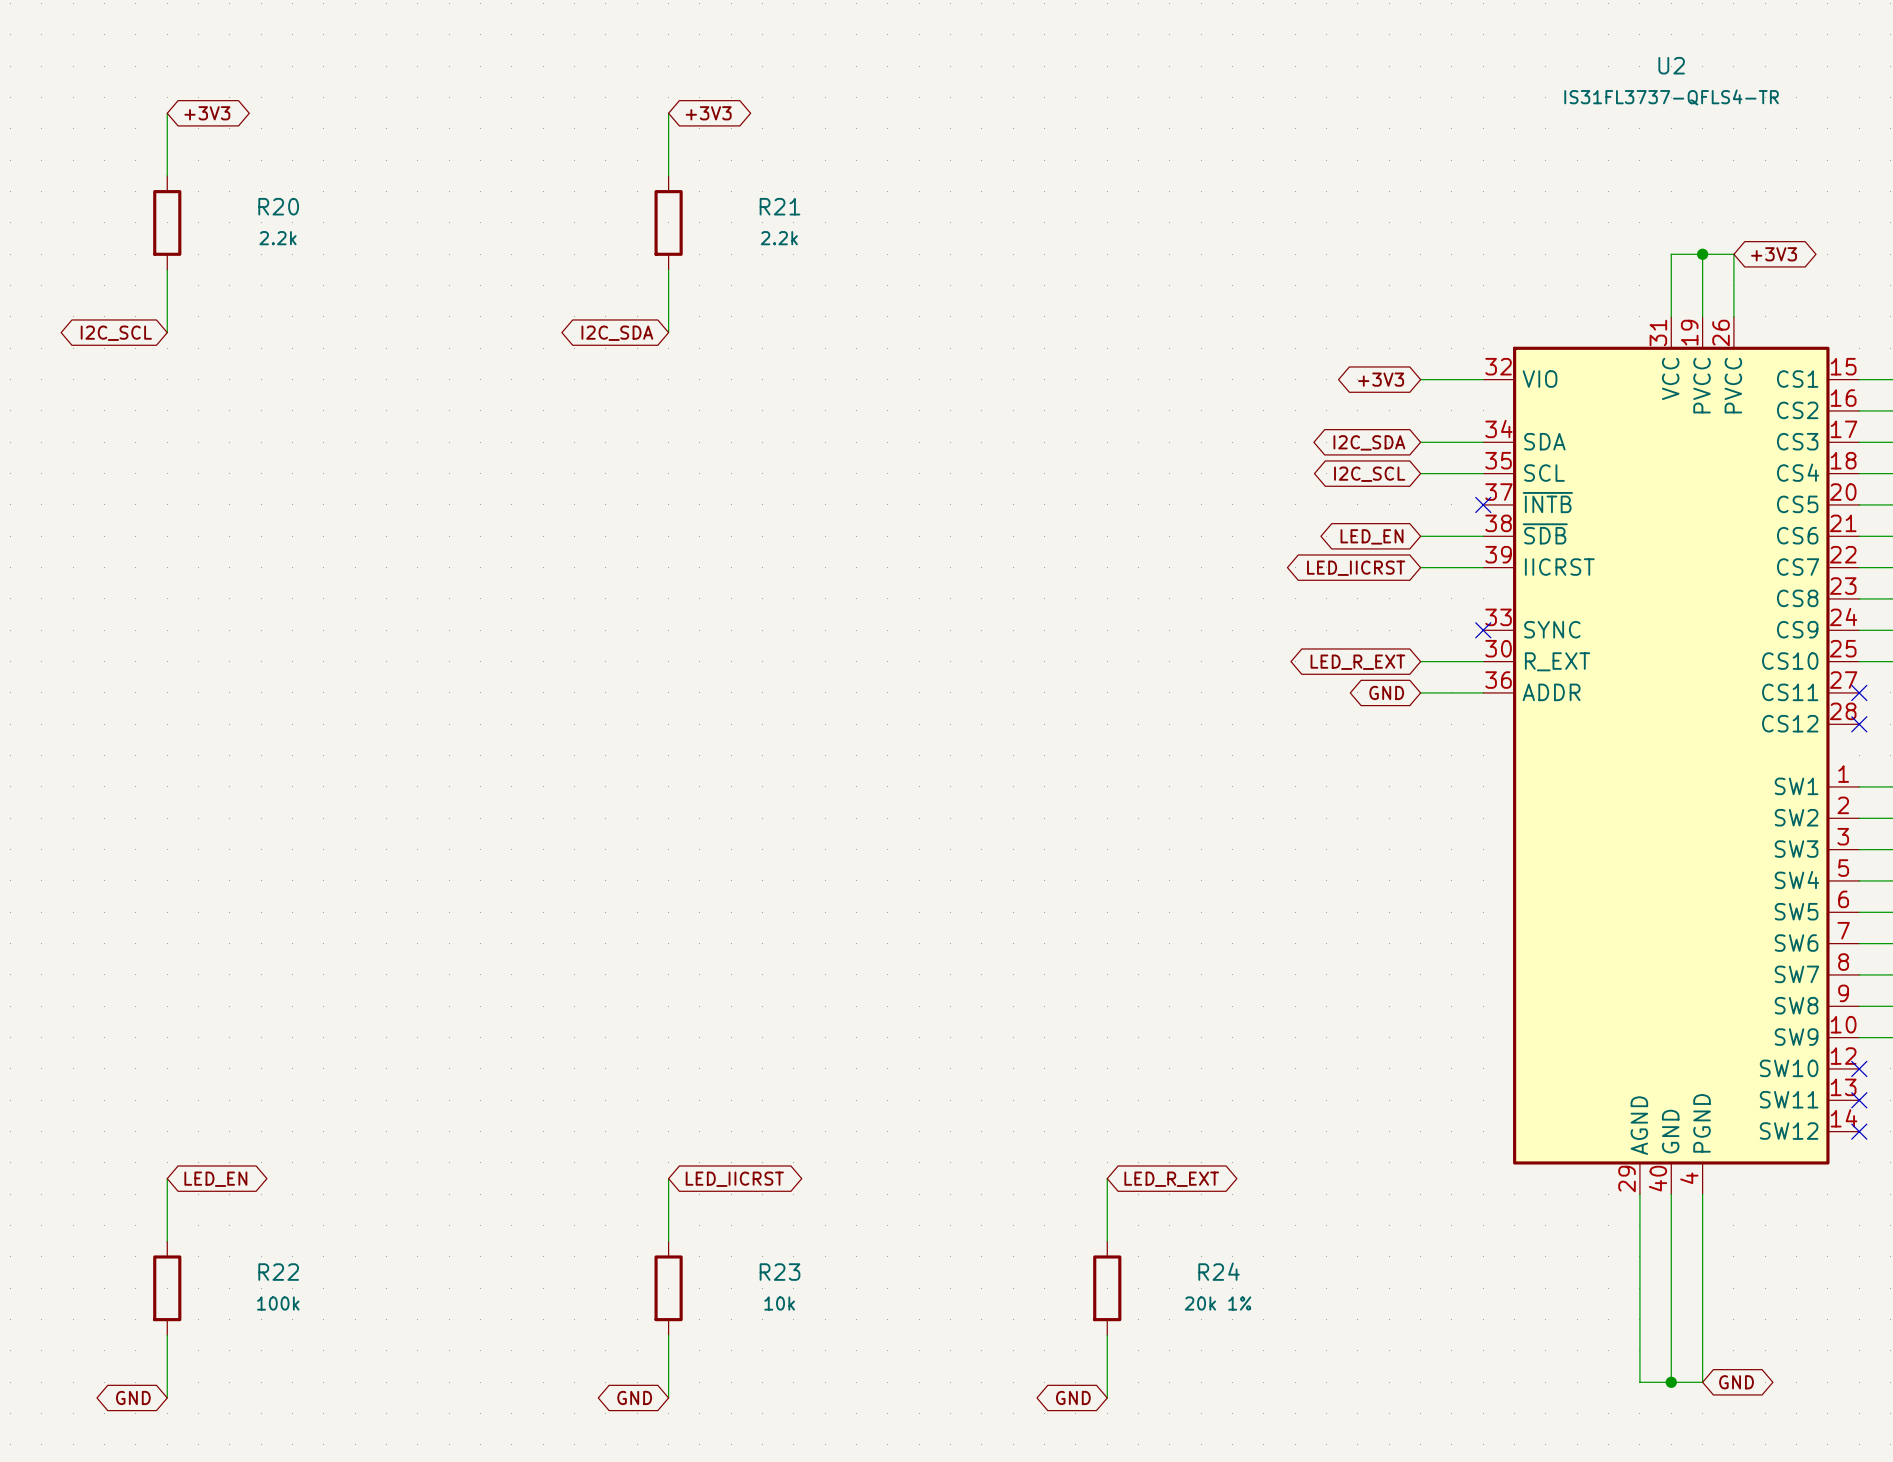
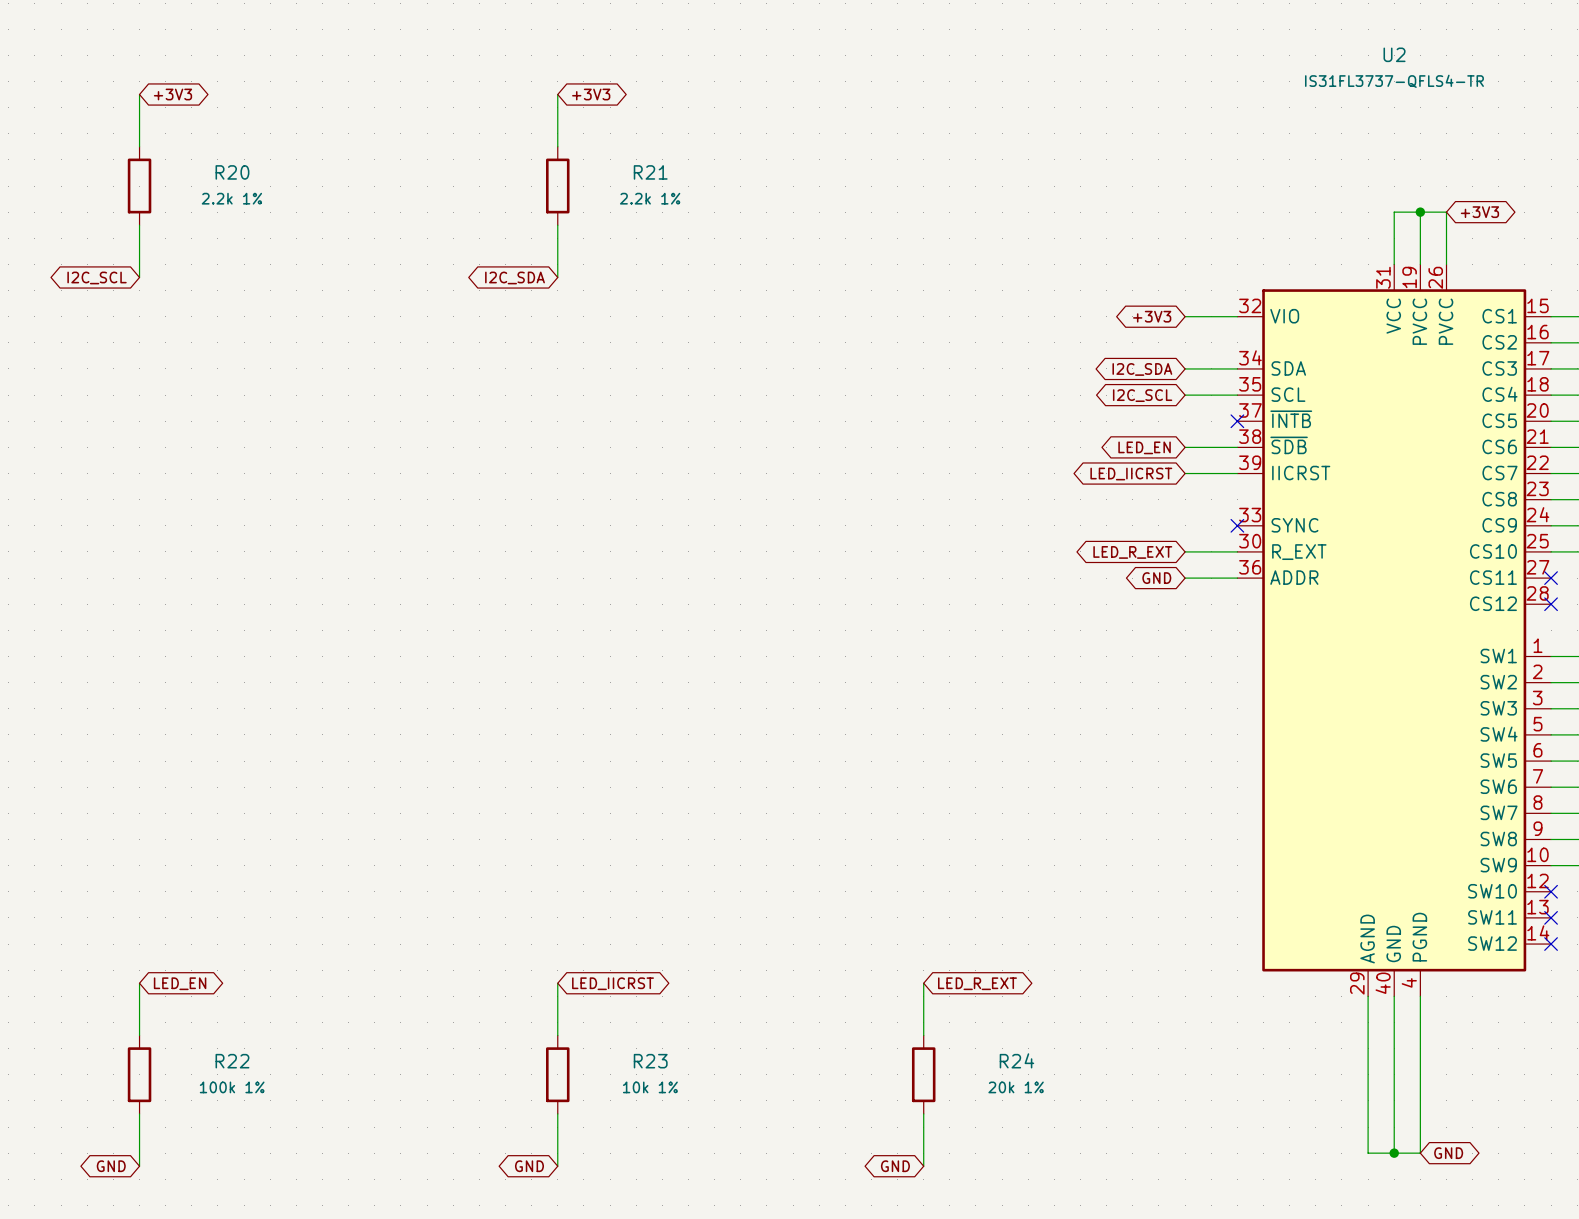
R20 value: 2.2k (278, 238) -> 2.2k 1% (231, 198)
R21 value: 2.2k (779, 238) -> 2.2k 1% (650, 198)
R22 value: 100k (278, 1303) -> 100k 1% (232, 1087)
R23 value: 10k (779, 1303) -> 10k 1% (650, 1087)

